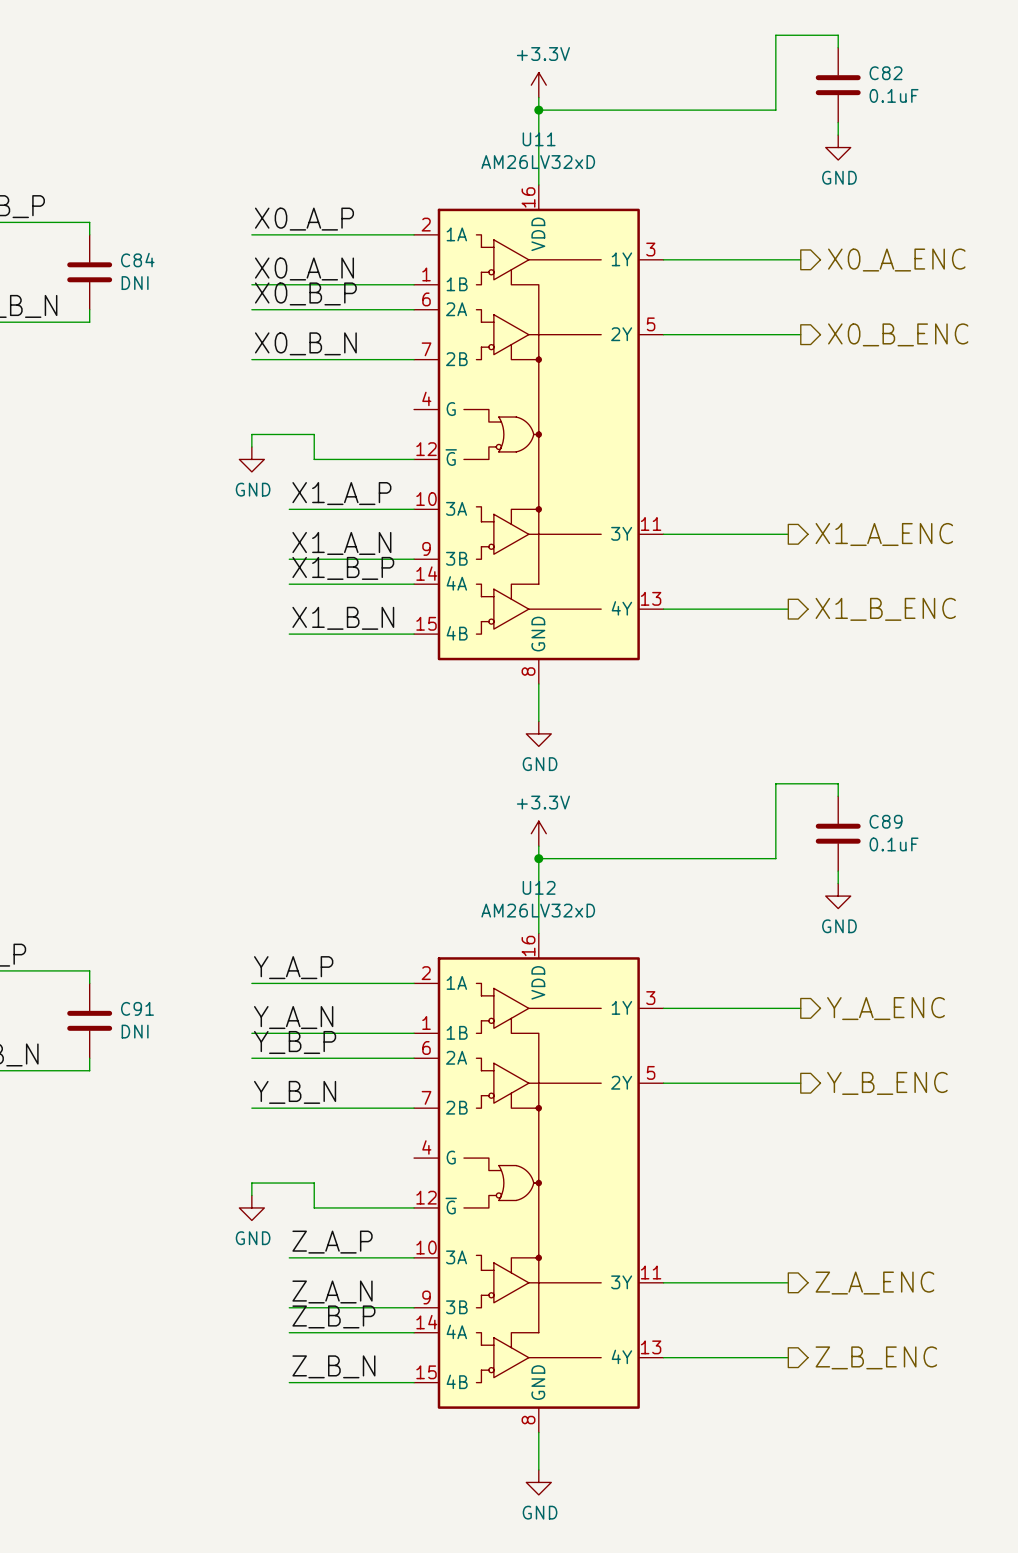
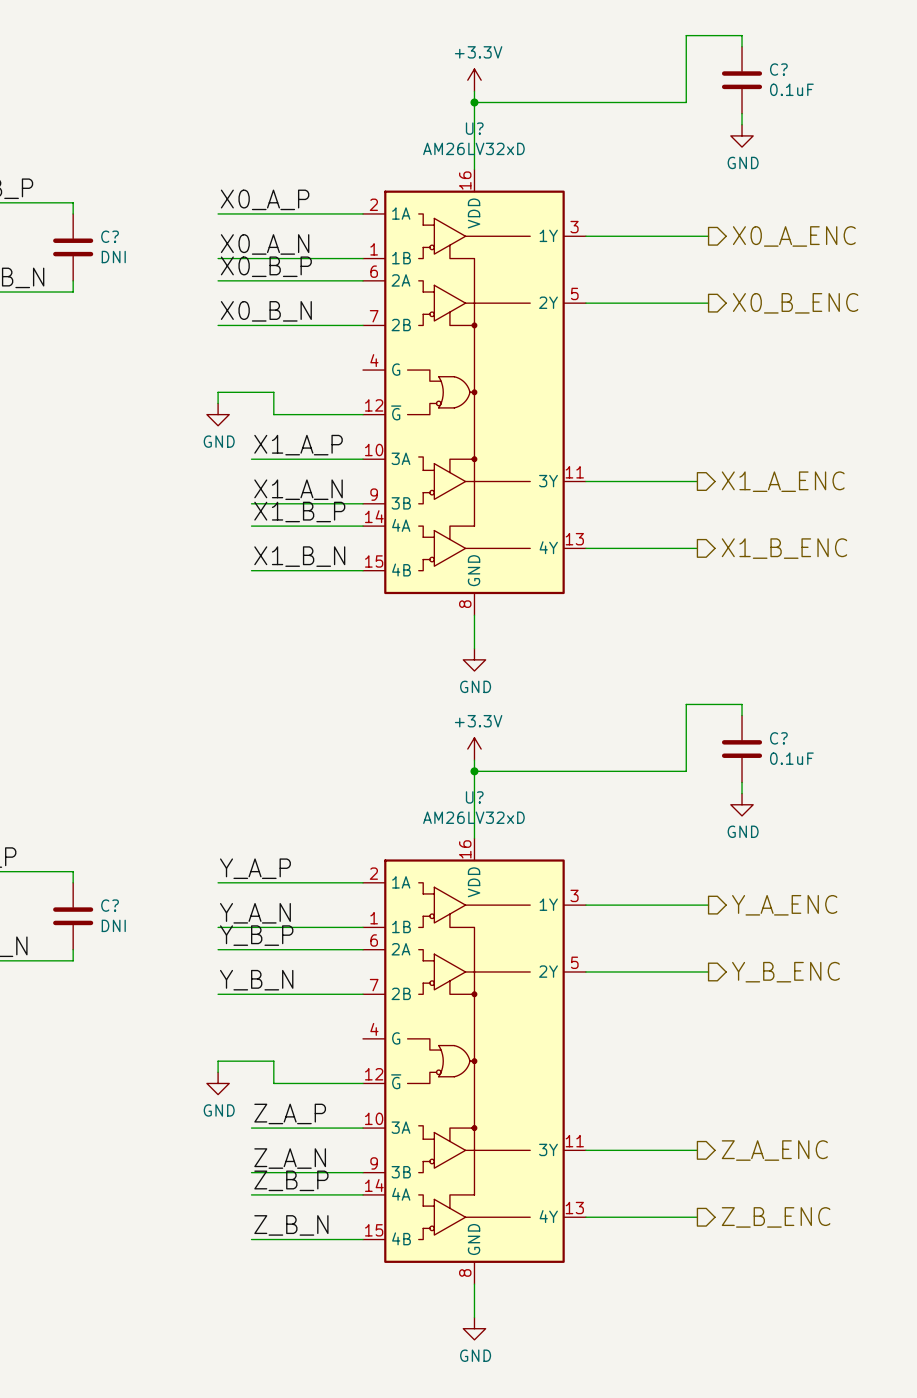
C82 name: C82 (886, 73) -> C? (778, 69)
U11 name: U11 (539, 139) -> U? (474, 128)
C84 name: C84 (137, 260) -> C? (110, 236)
C89 name: C89 (886, 821) -> C? (778, 738)
U12 name: U12 (539, 887) -> U? (474, 797)
C91 name: C91 (137, 1008) -> C? (110, 905)

